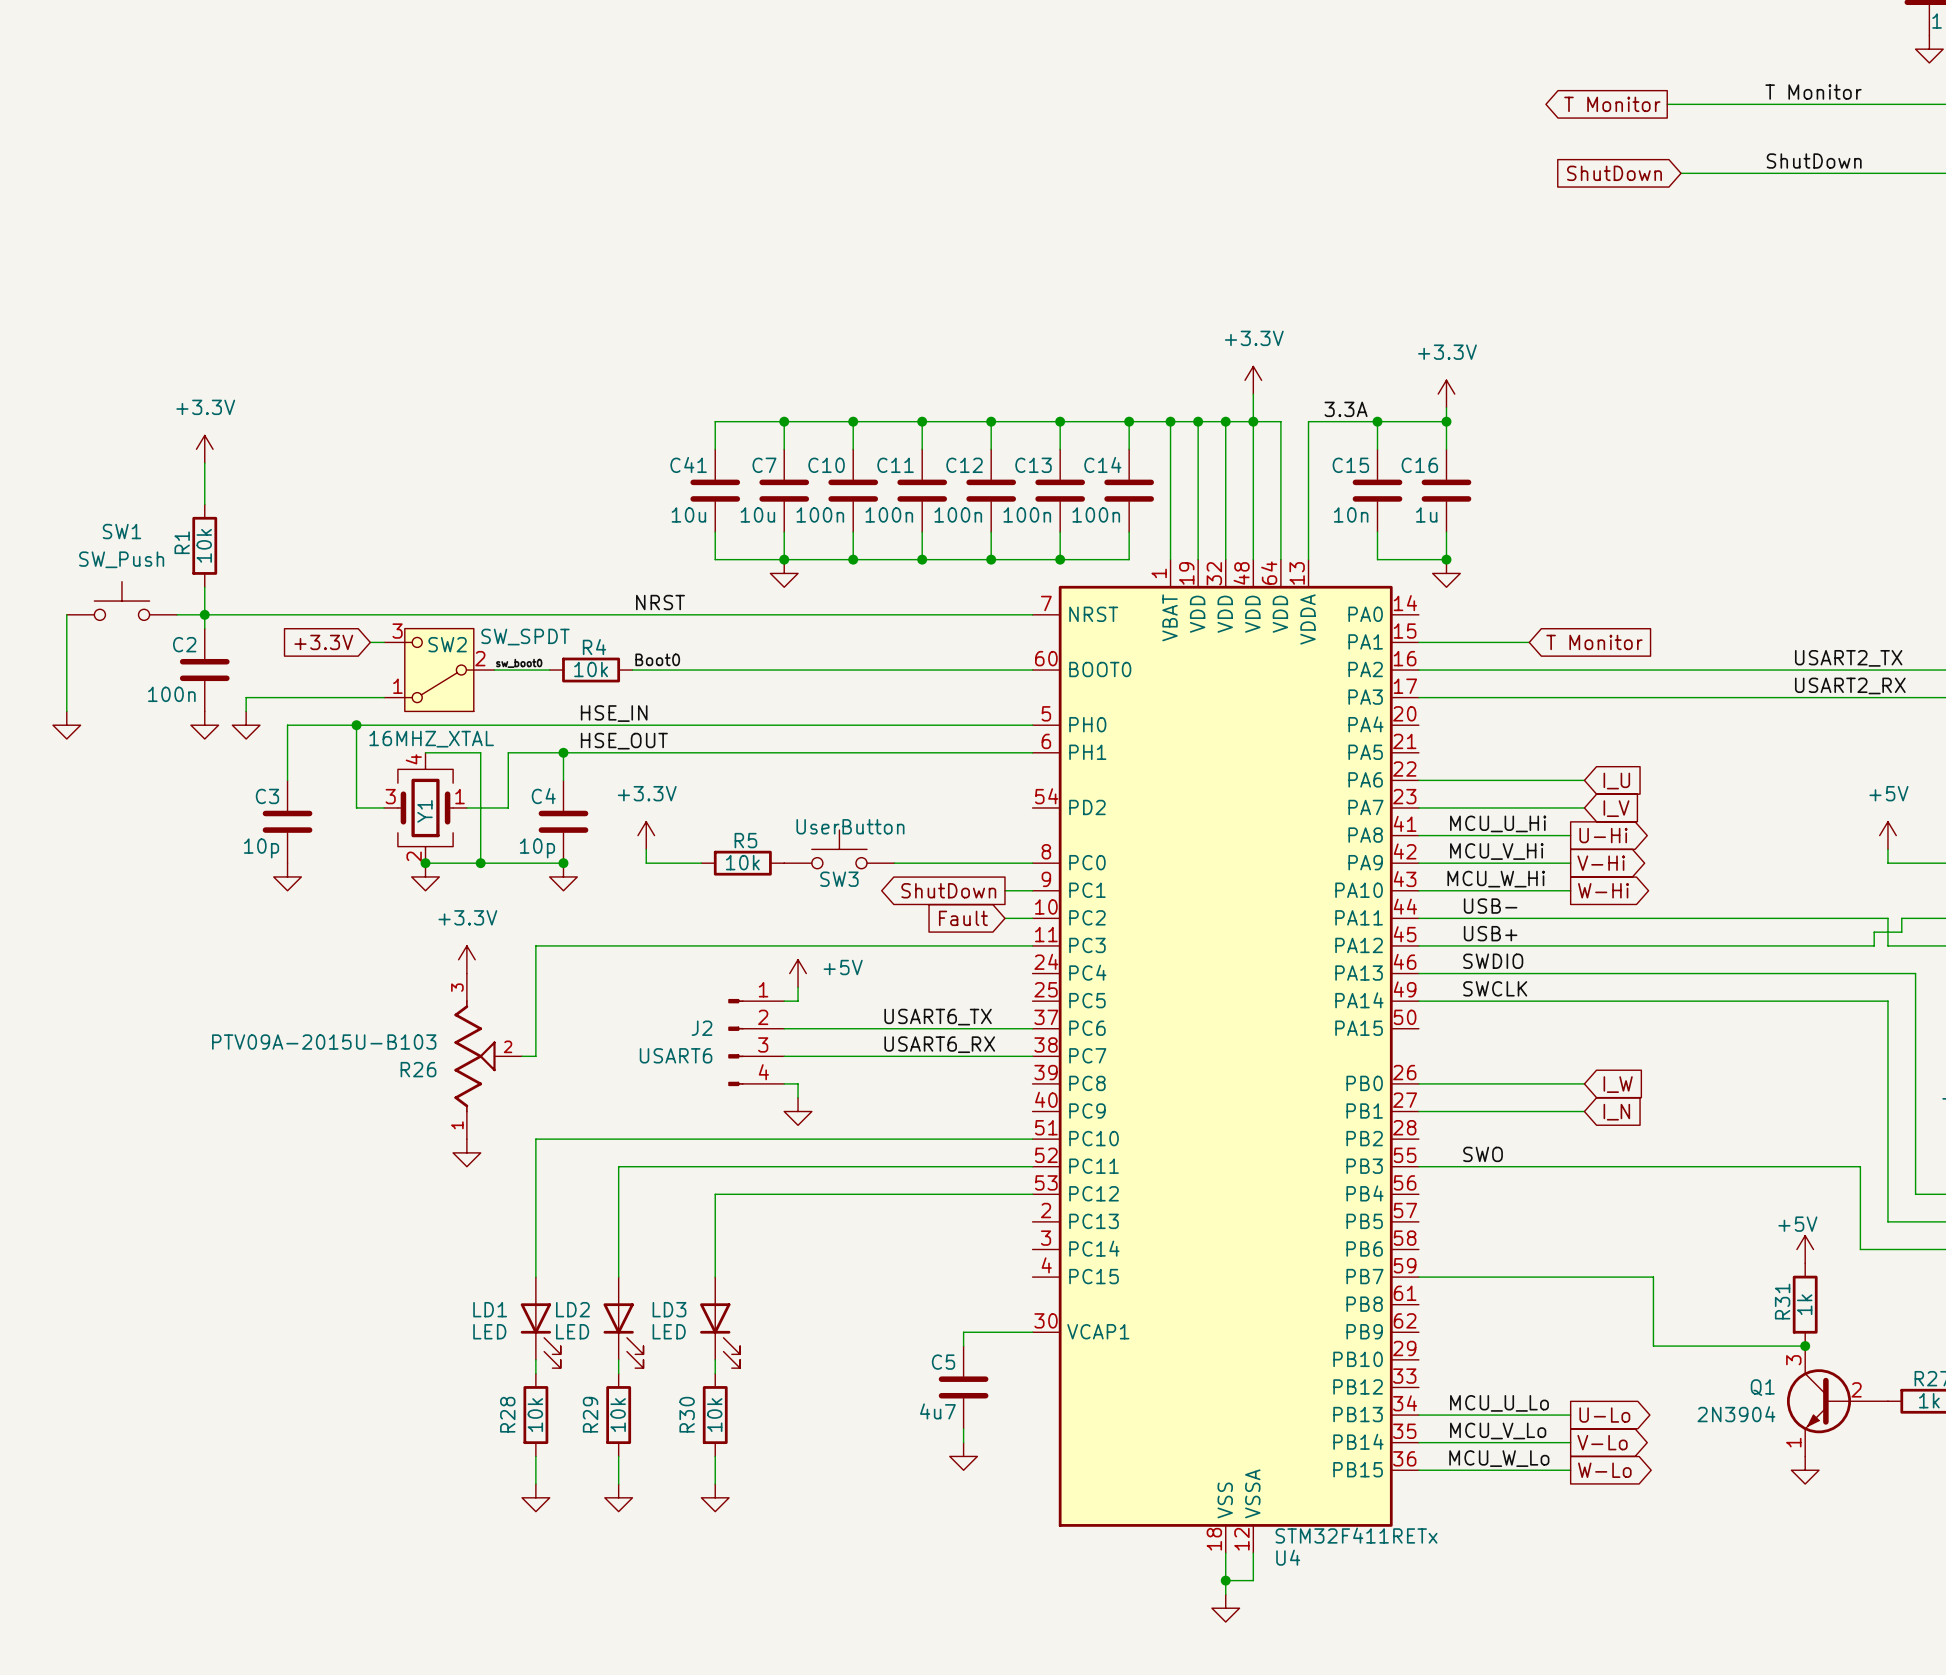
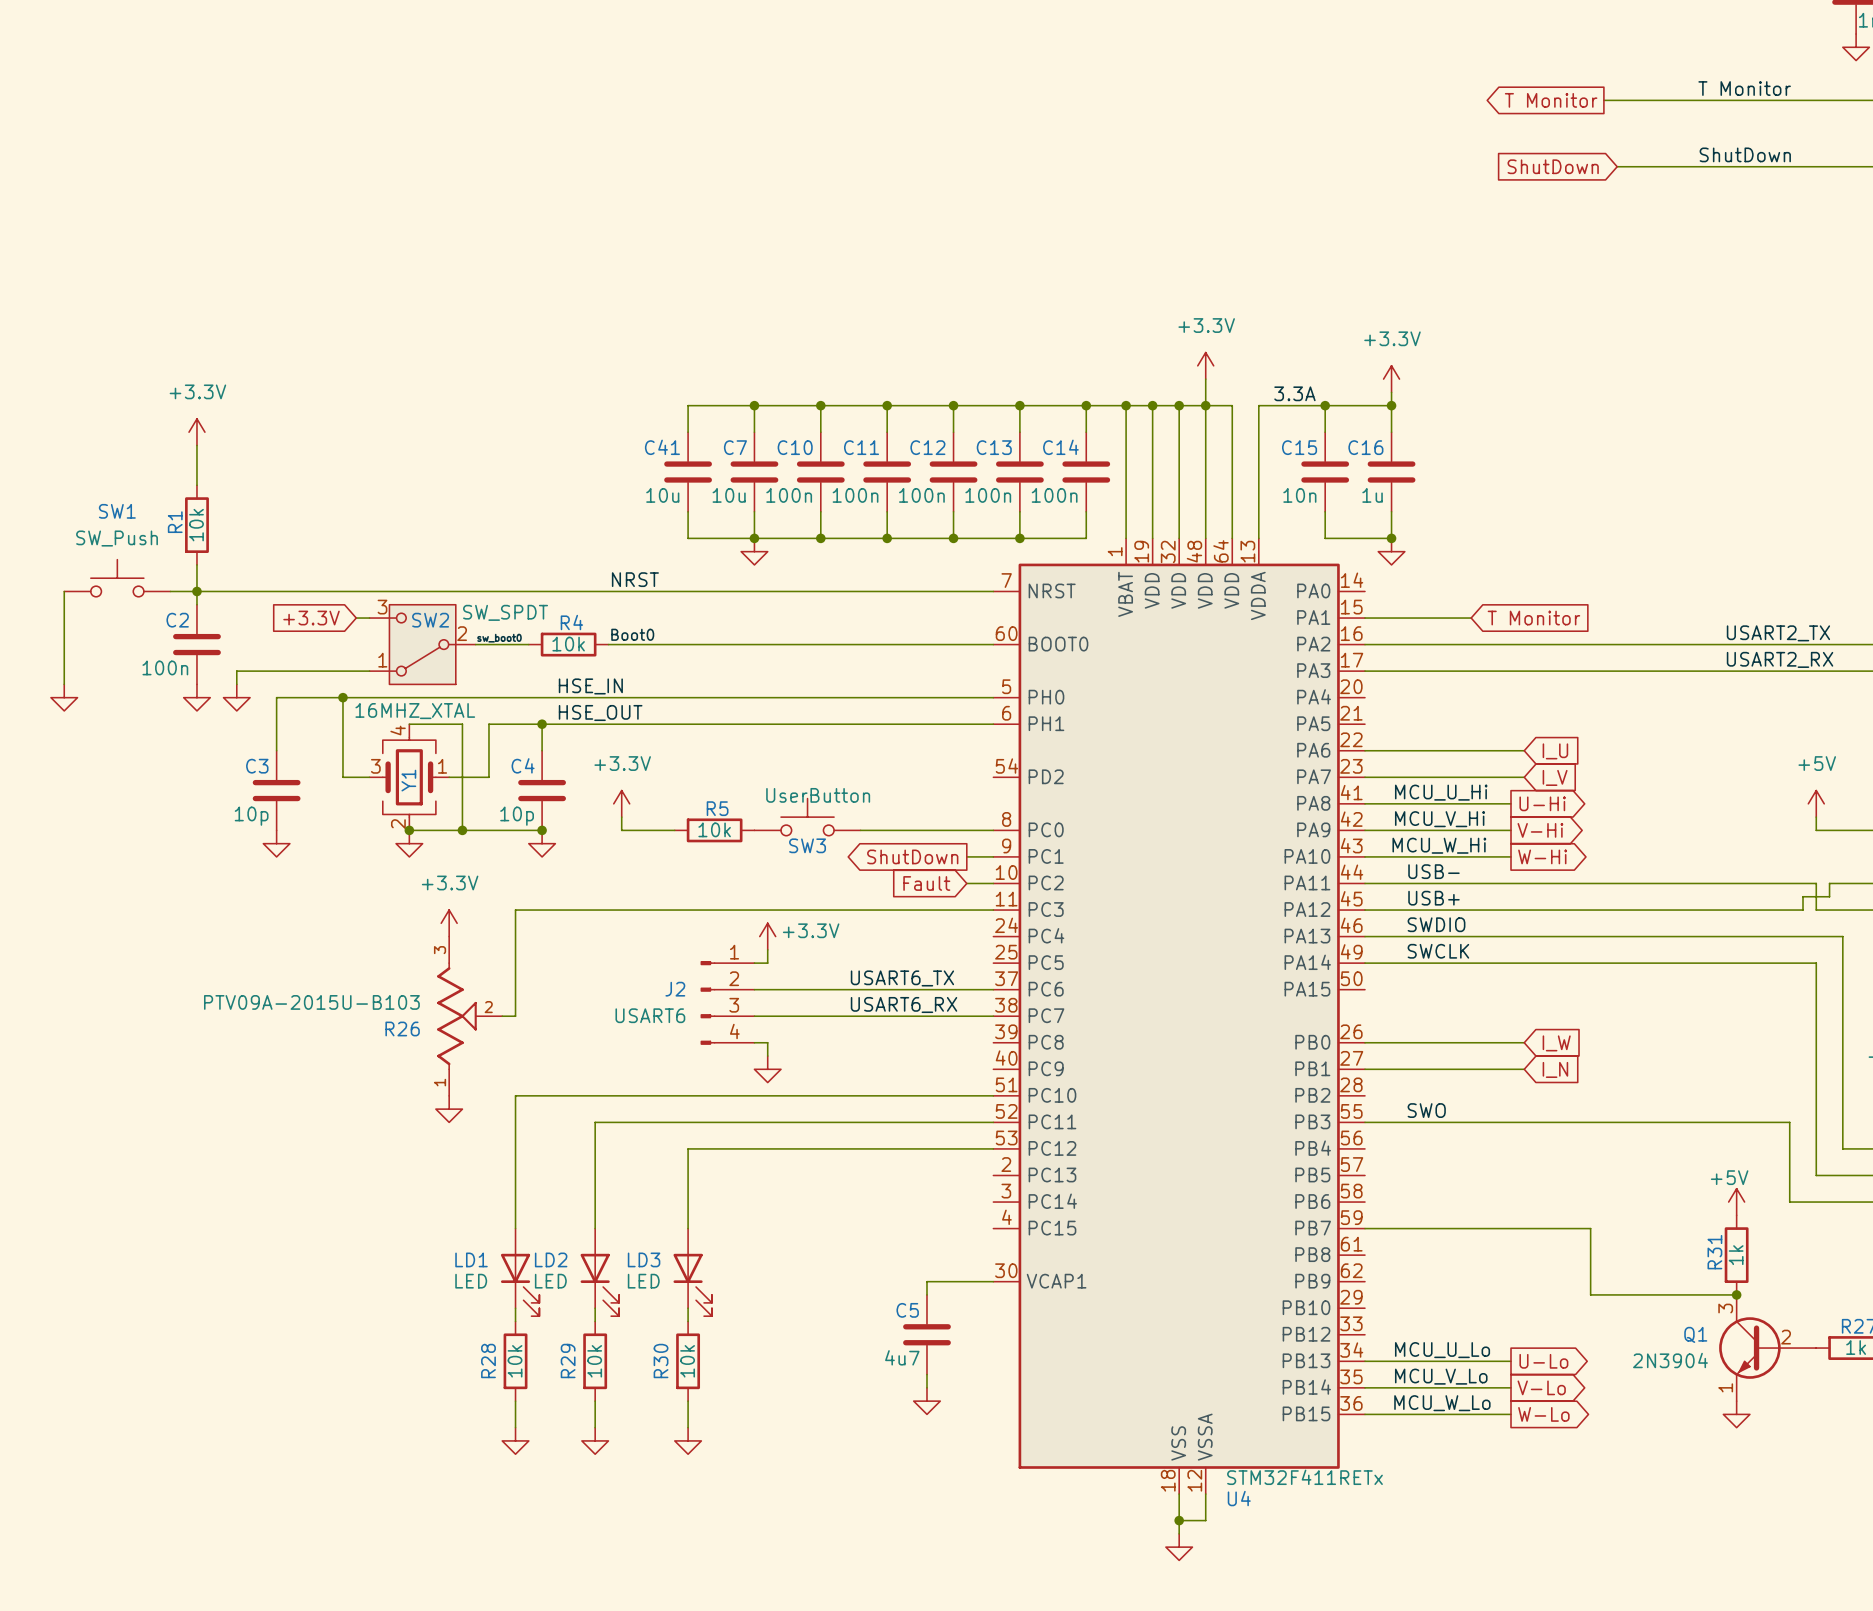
power symbol: +5V (798, 973) -> +3.3V (767, 936)

